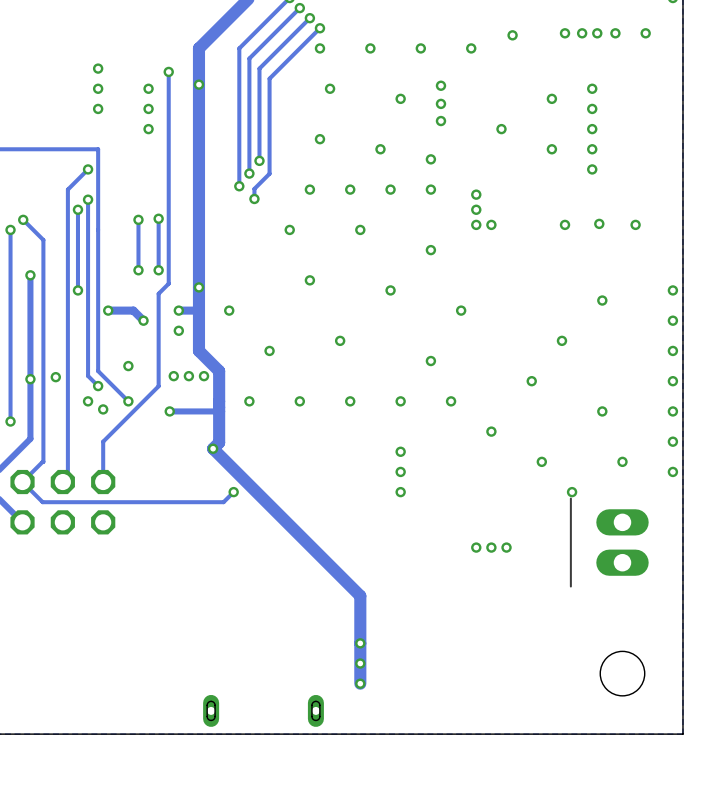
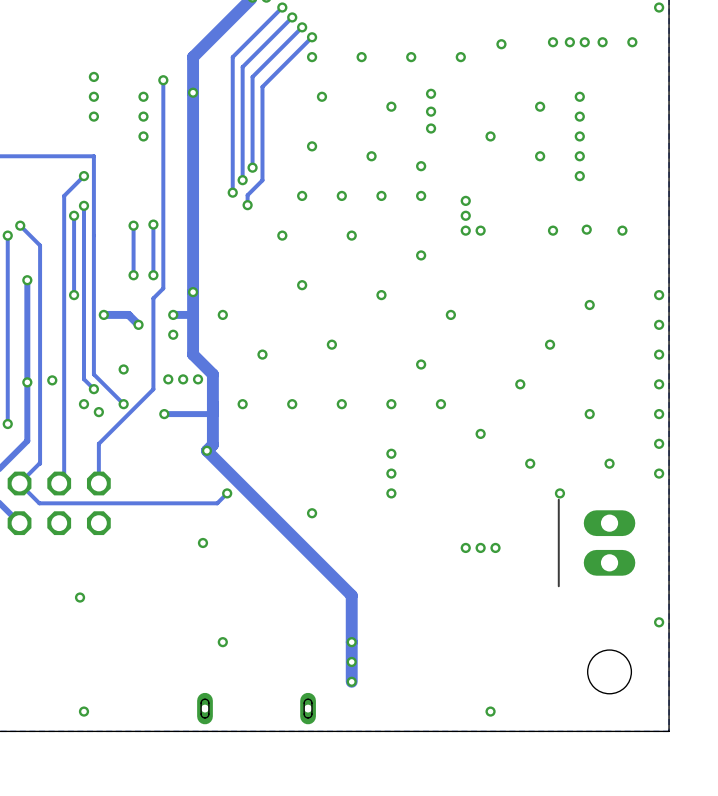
via: none -> (312, 513)
via: none -> (202, 542)
via: none -> (80, 597)
via: none -> (659, 622)
via: none -> (222, 642)
via: none -> (84, 711)
via: none -> (490, 711)

